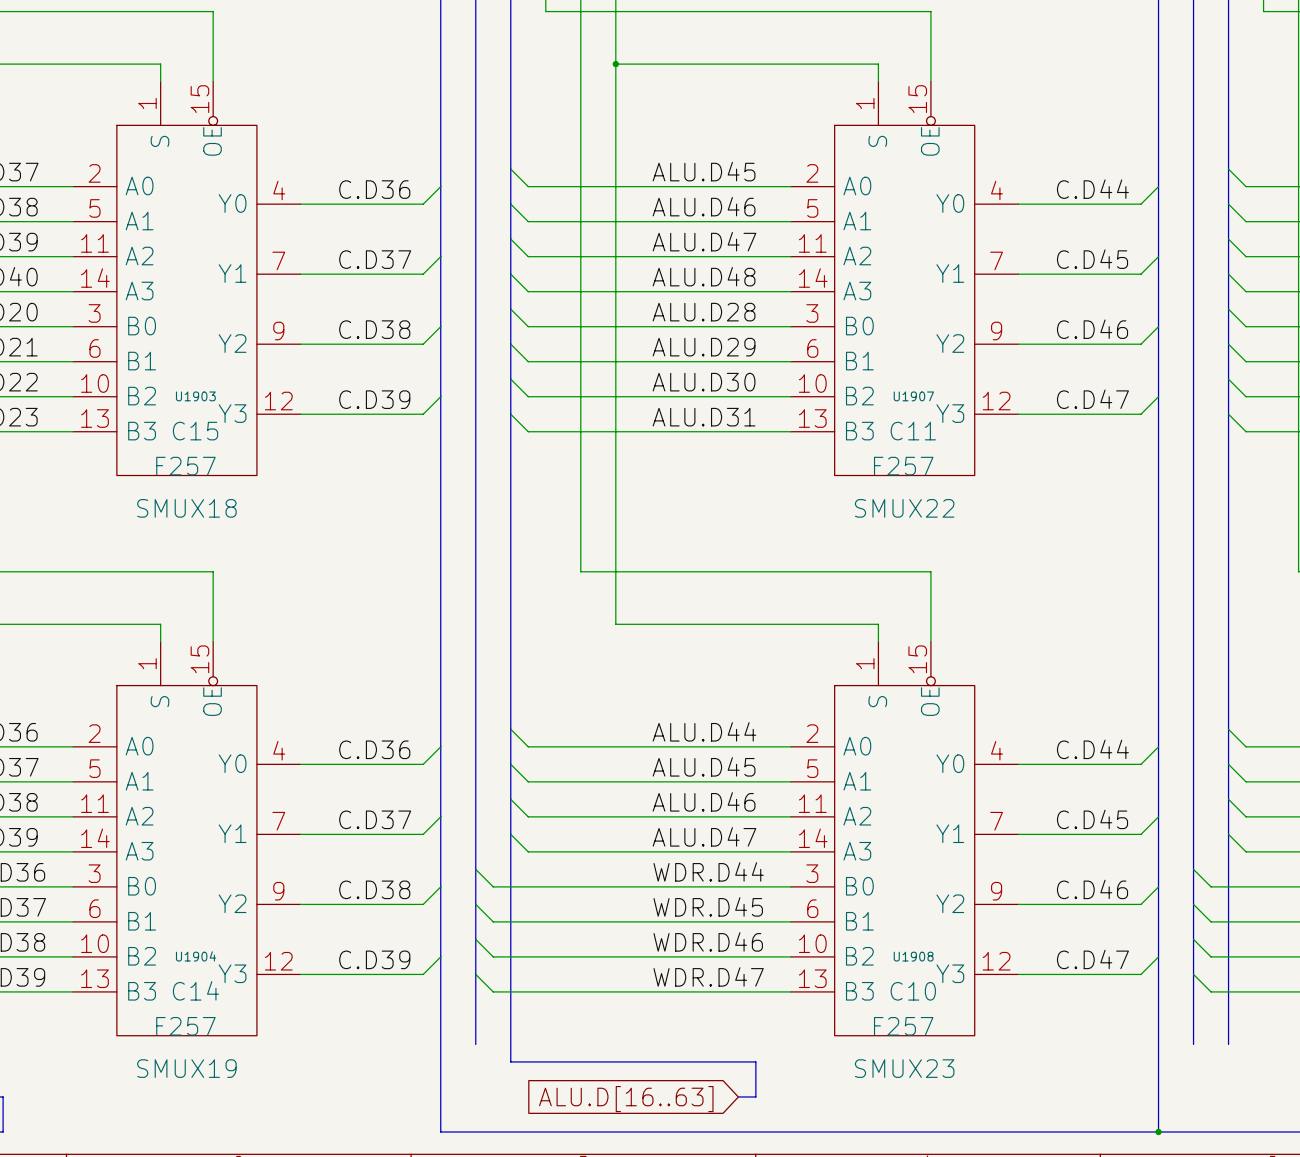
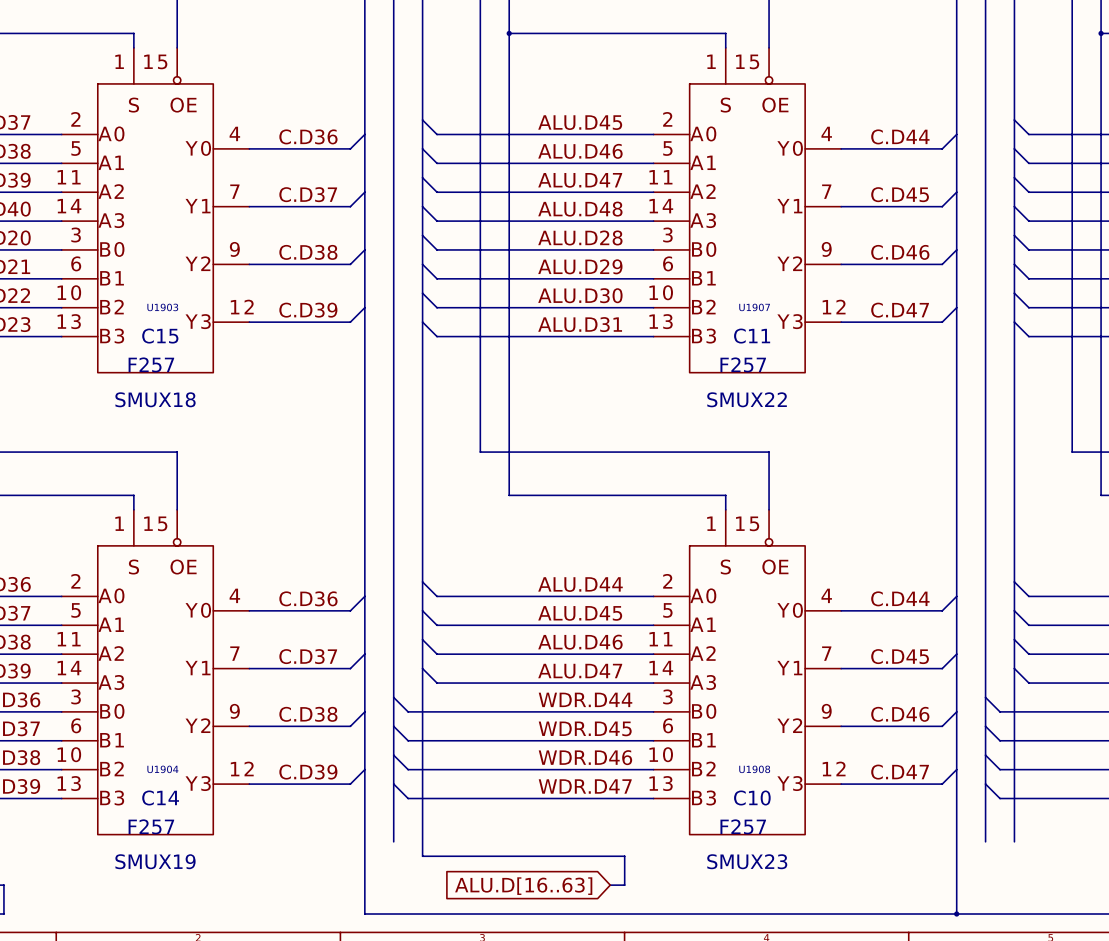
U1903 symbol: [73, 81, 301, 476] -> [61, 47, 250, 373]
U1907 symbol: [790, 81, 1019, 476] -> [653, 47, 842, 373]
U1904 symbol: [73, 641, 301, 1036] -> [61, 509, 250, 835]
U1908 symbol: [790, 641, 1019, 1036] -> [653, 509, 842, 835]

